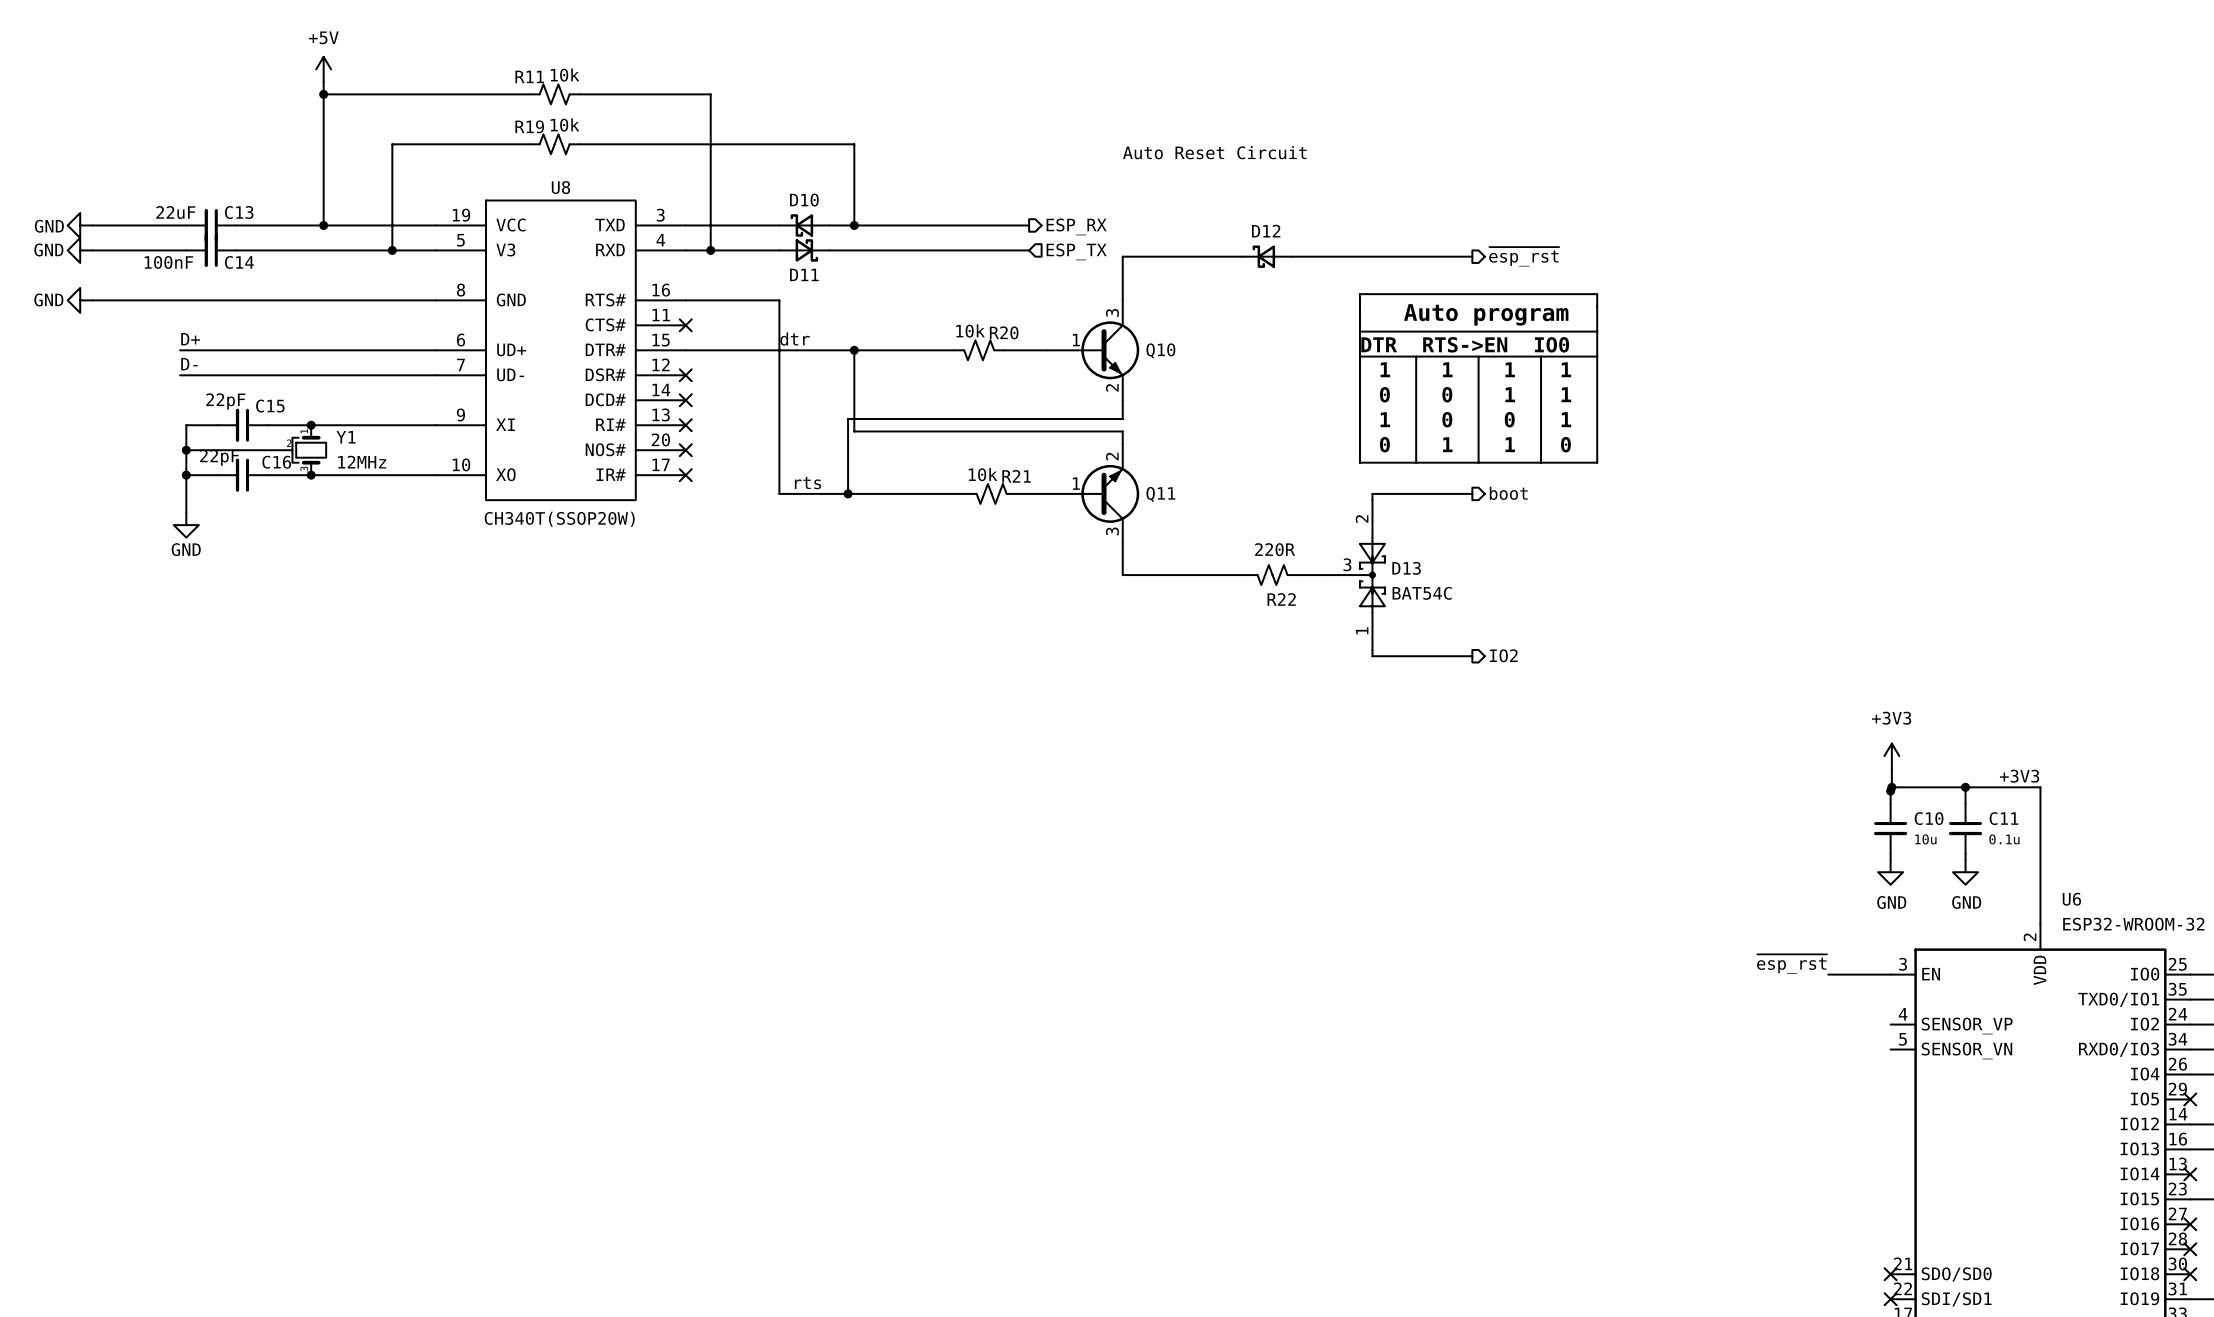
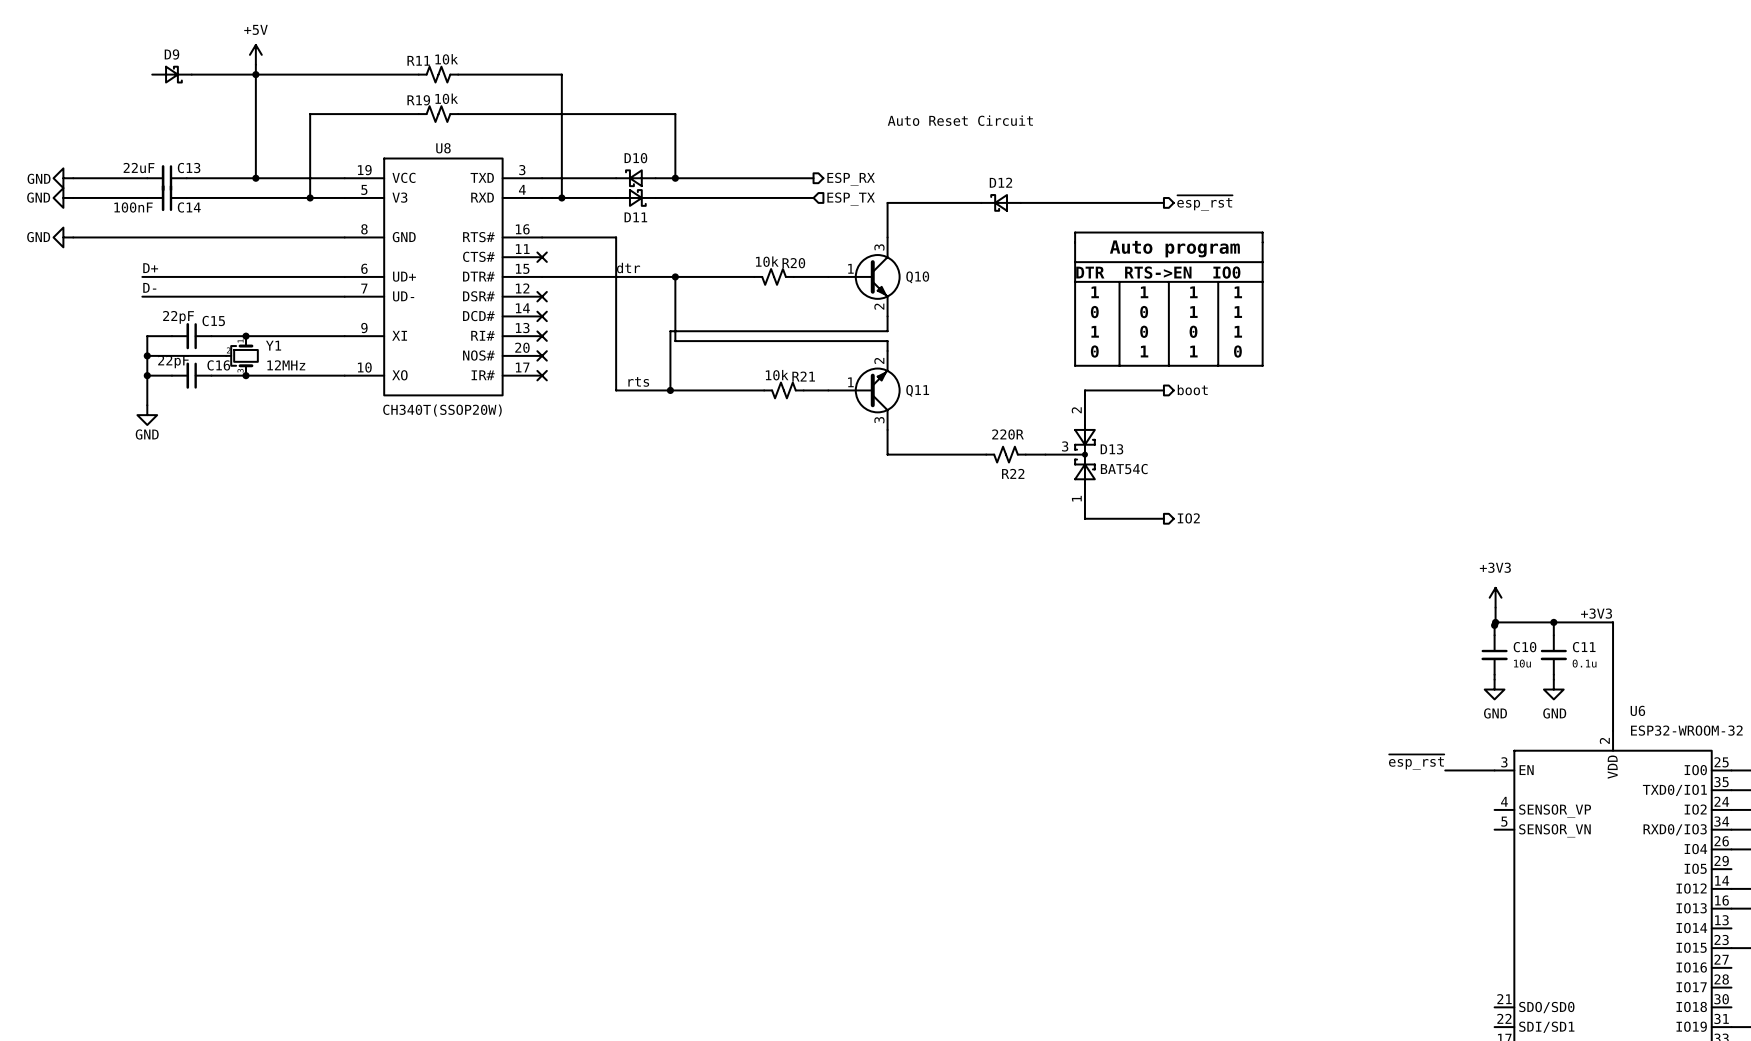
D9: none -> (171, 74)
wire: none -> (191, 74) (255, 74)
no-connect mark: (2190, 1099) -> none
no-connect mark: (2190, 1174) -> none
no-connect mark: (2190, 1224) -> none
no-connect mark: (2190, 1249) -> none
no-connect mark: (1890, 1274) -> none
no-connect mark: (2190, 1274) -> none
no-connect mark: (1890, 1299) -> none

